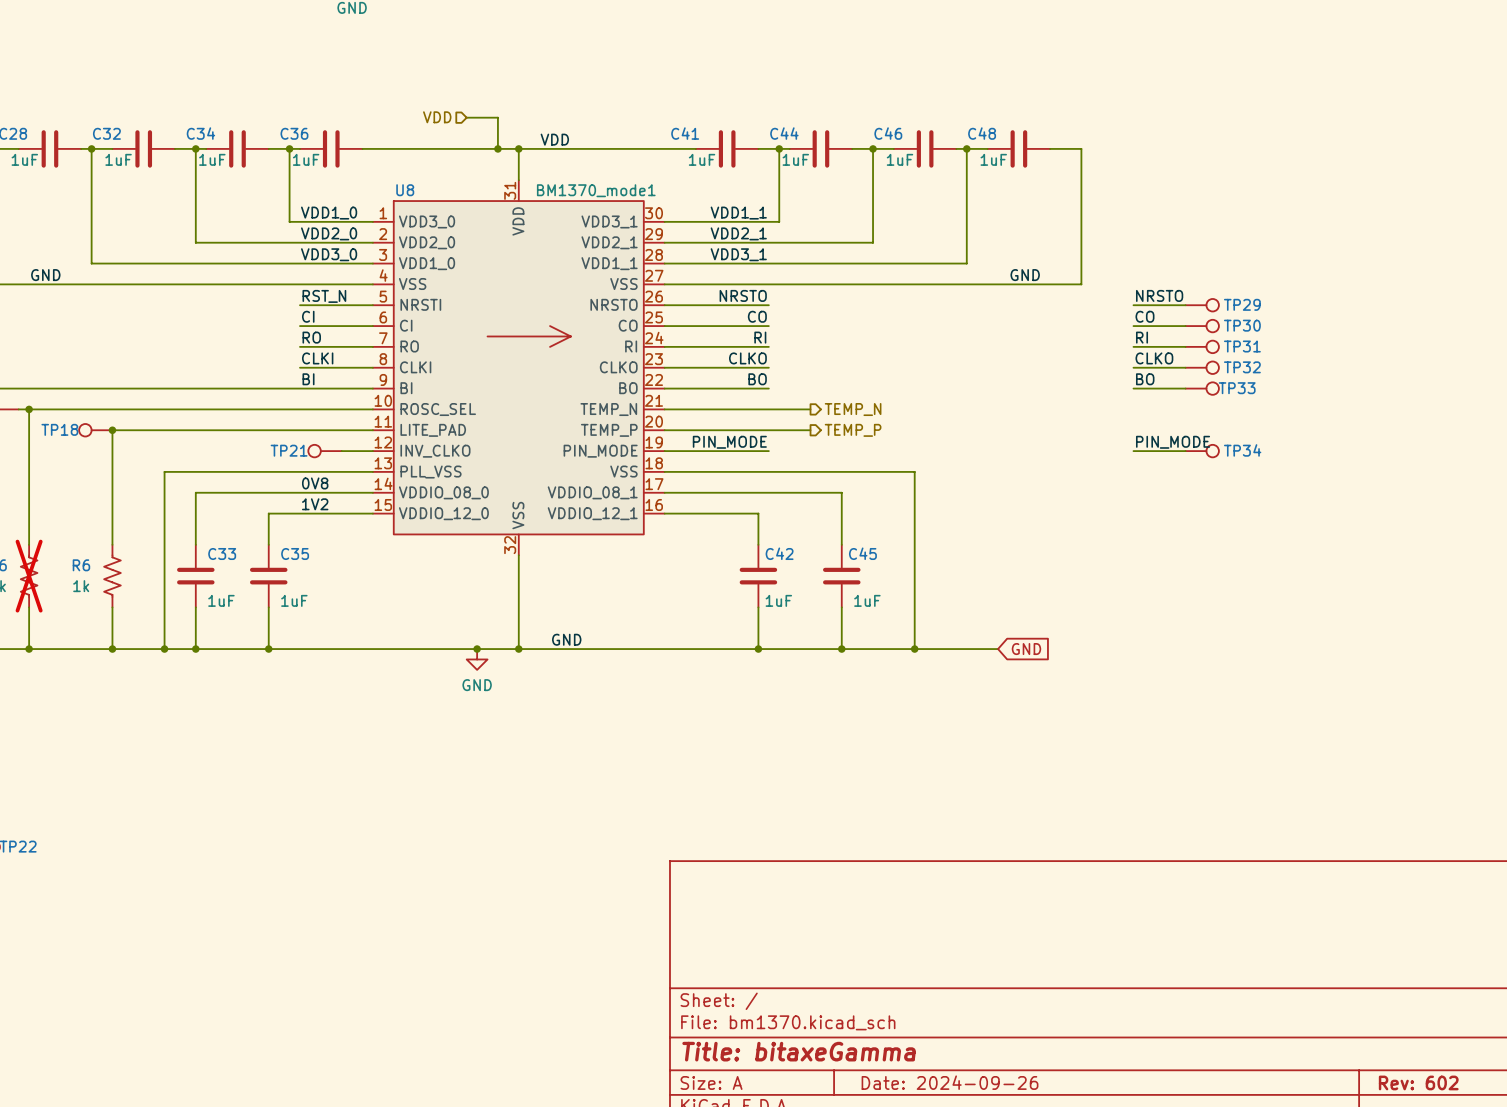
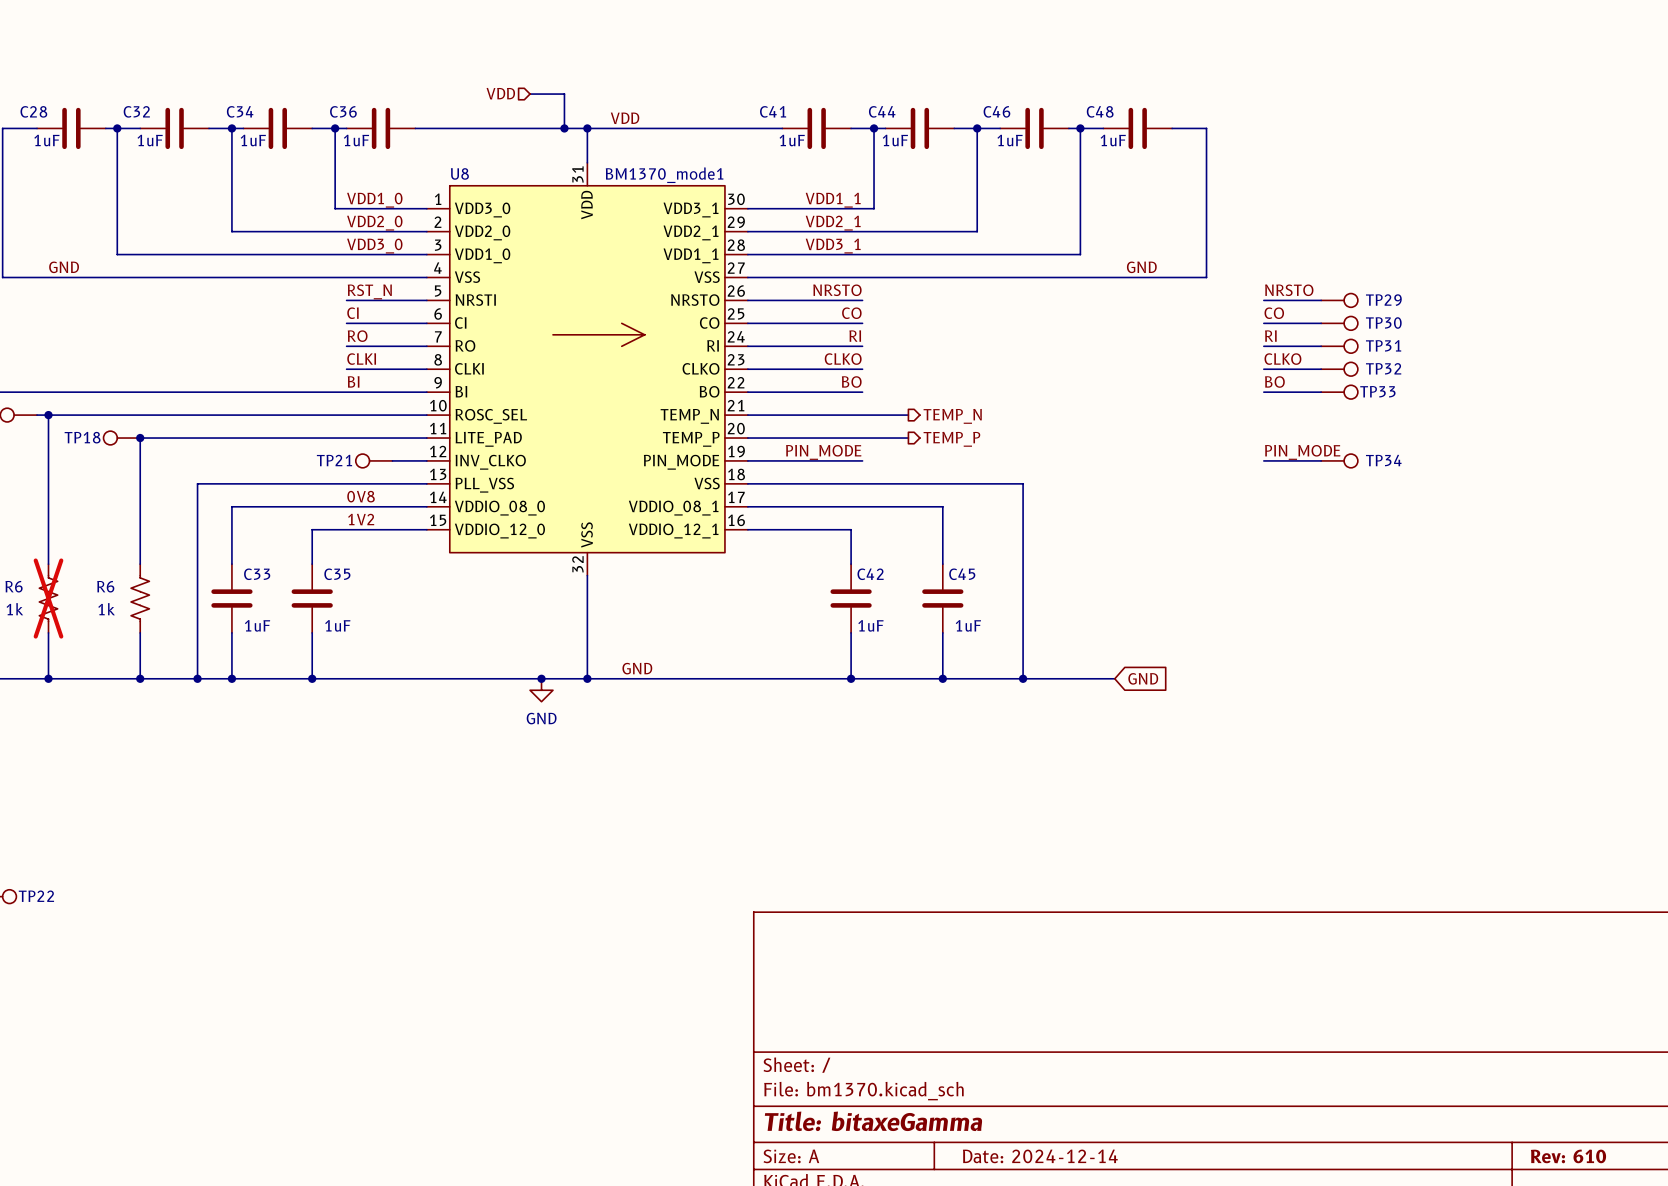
title block: Date: 2024-09-26 (950, 1082) -> Date: 2024-12-14 (1040, 1156)
title block: Rev: 602 (1418, 1082) -> Rev: 610 (1568, 1156)

